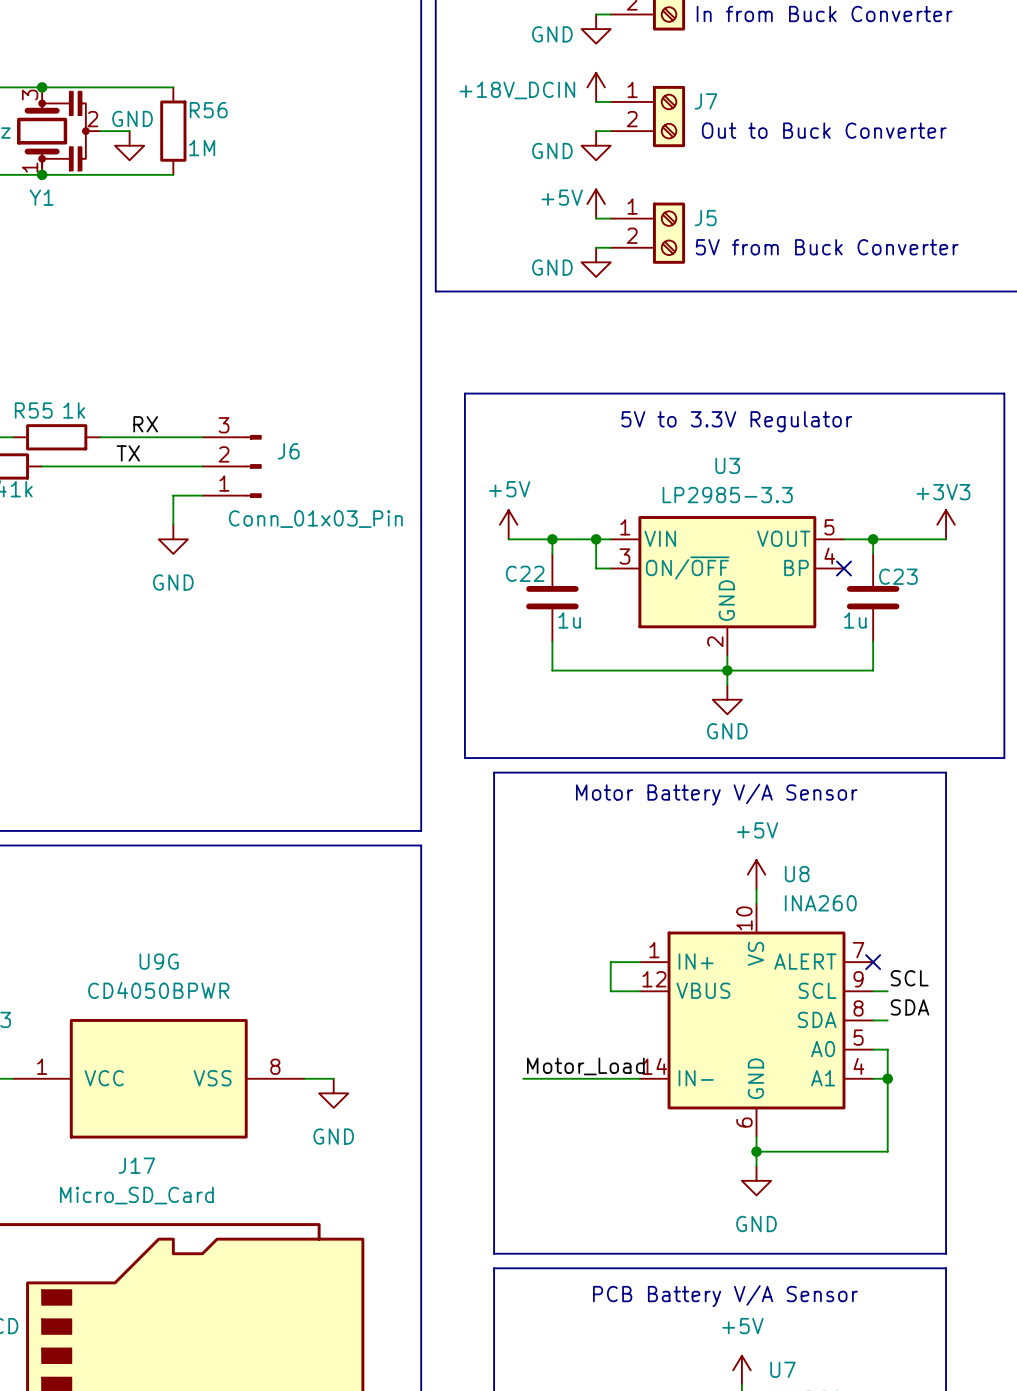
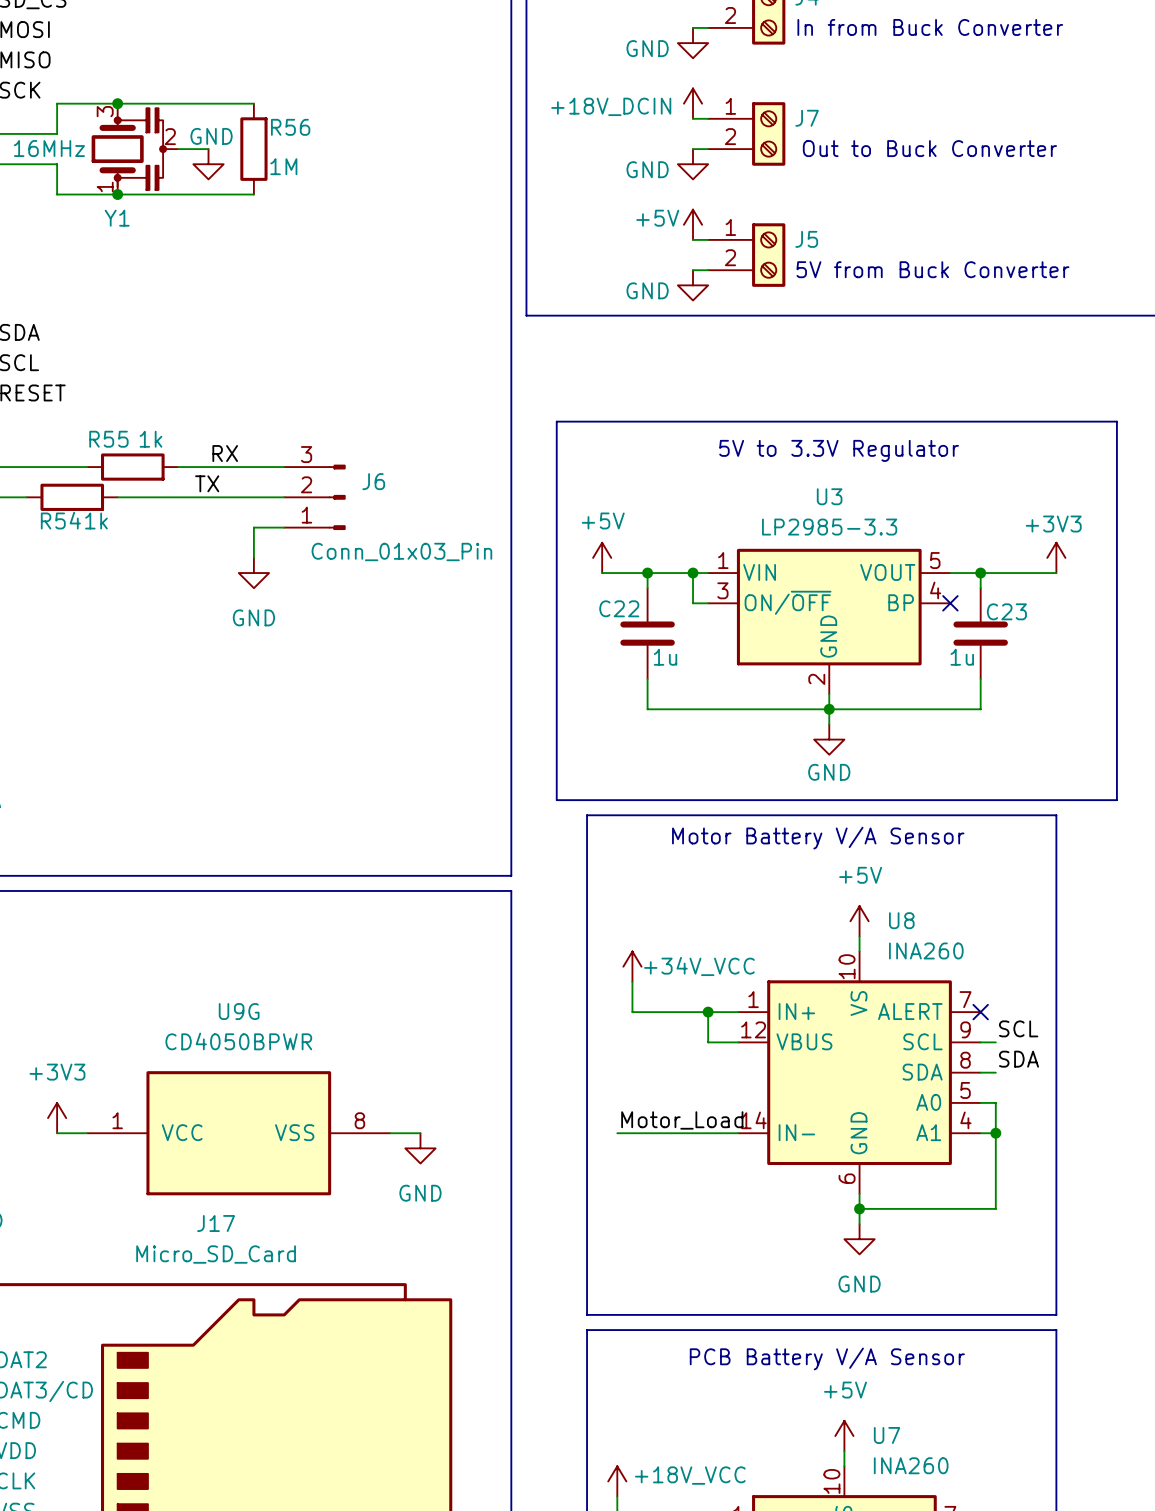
power symbol: none -> +34V_VCC (632, 966)
wire: none -> (632, 981) (632, 1012) (708, 1012)
junction: none -> (708, 1012)

